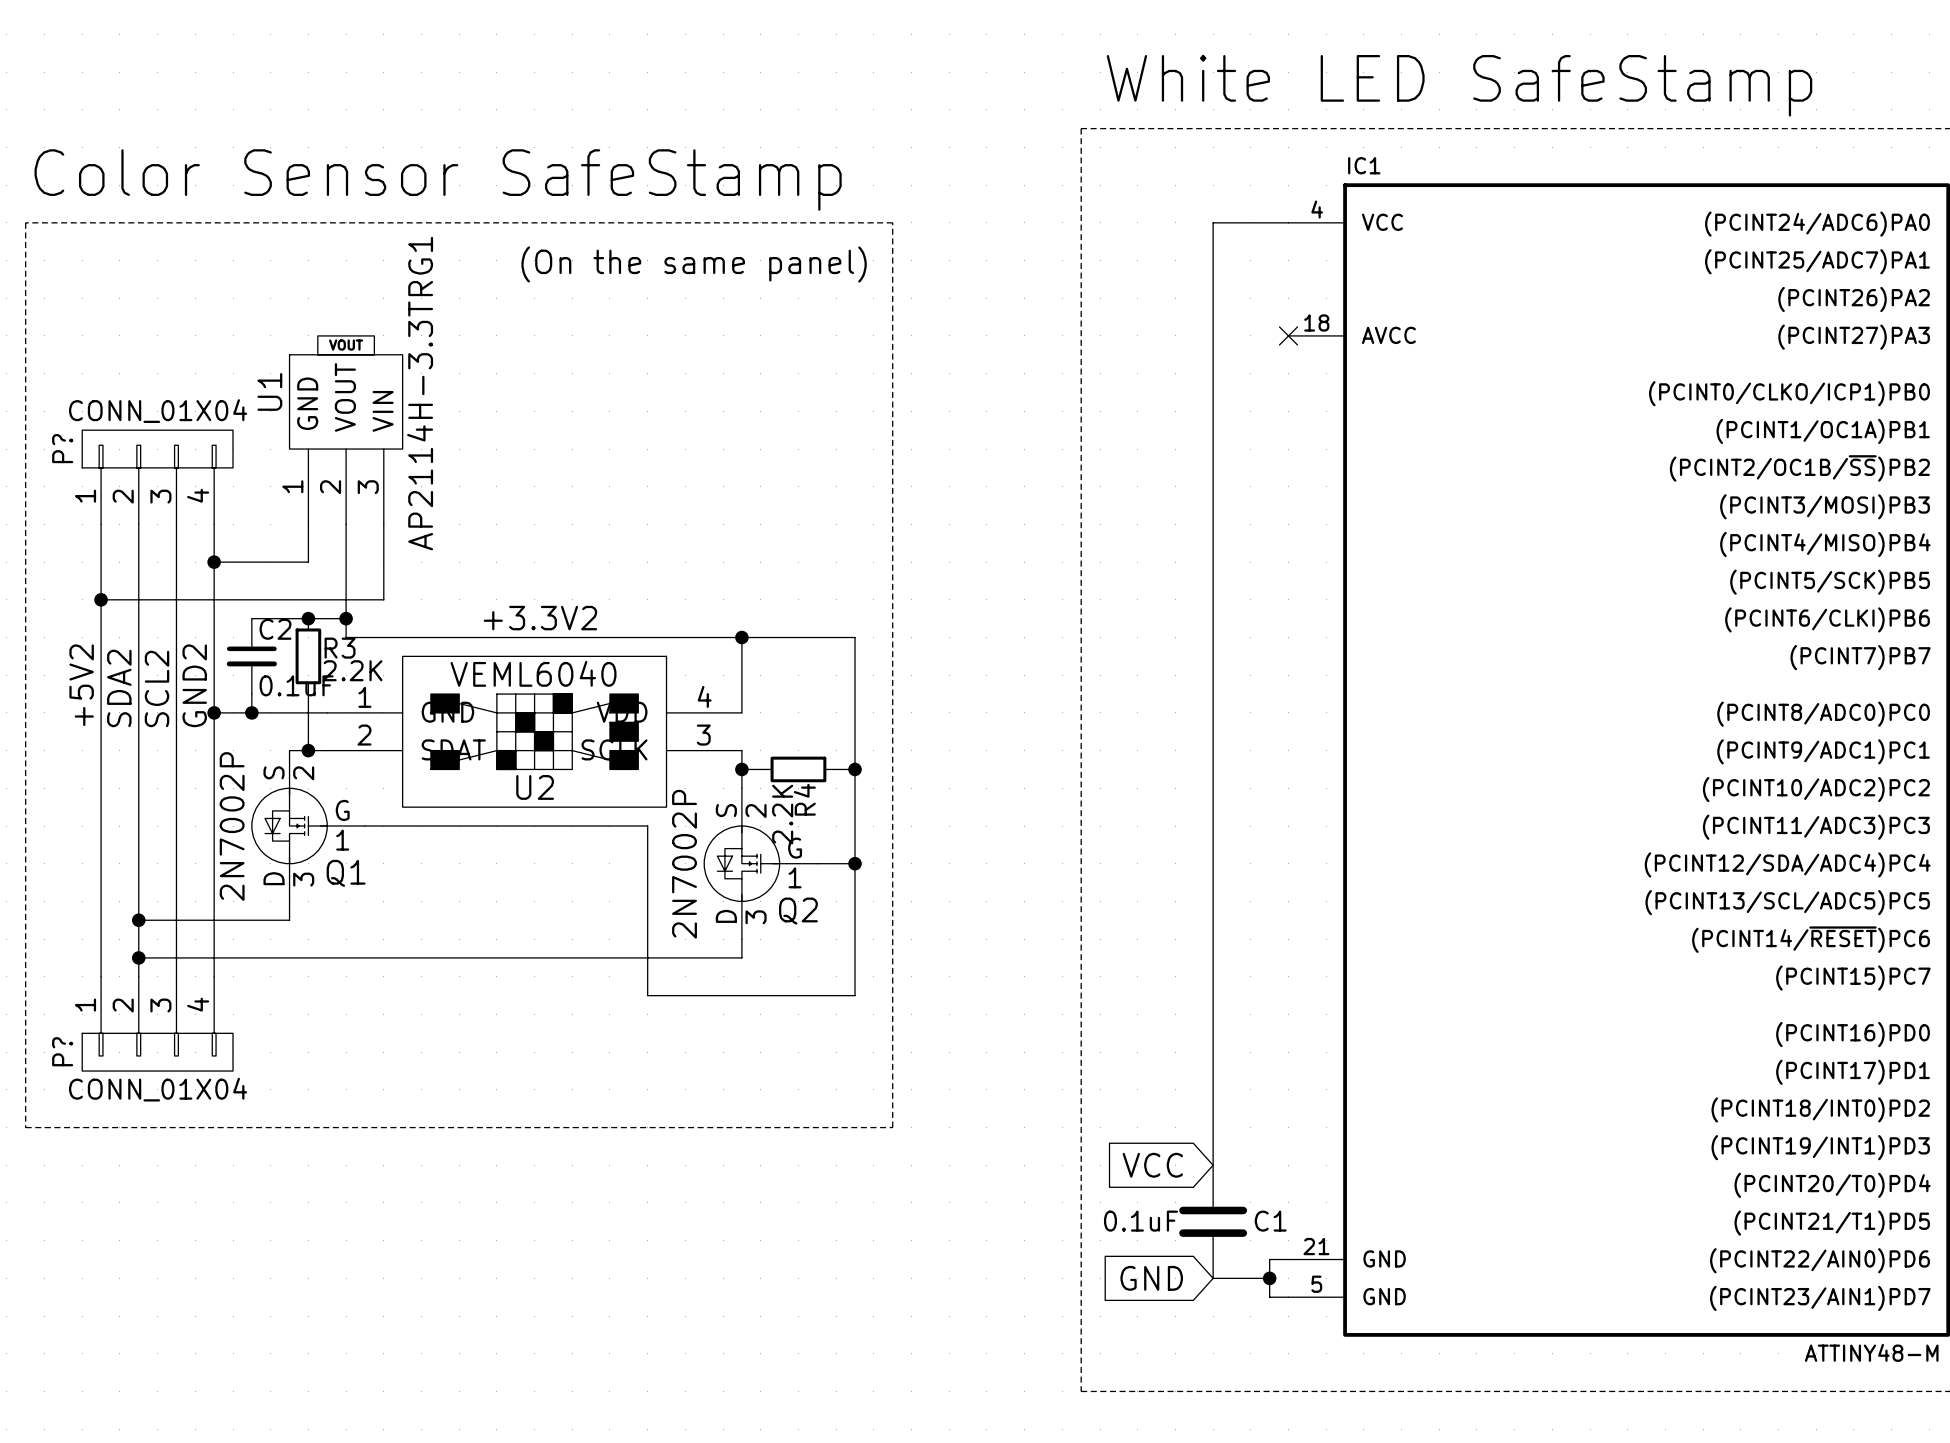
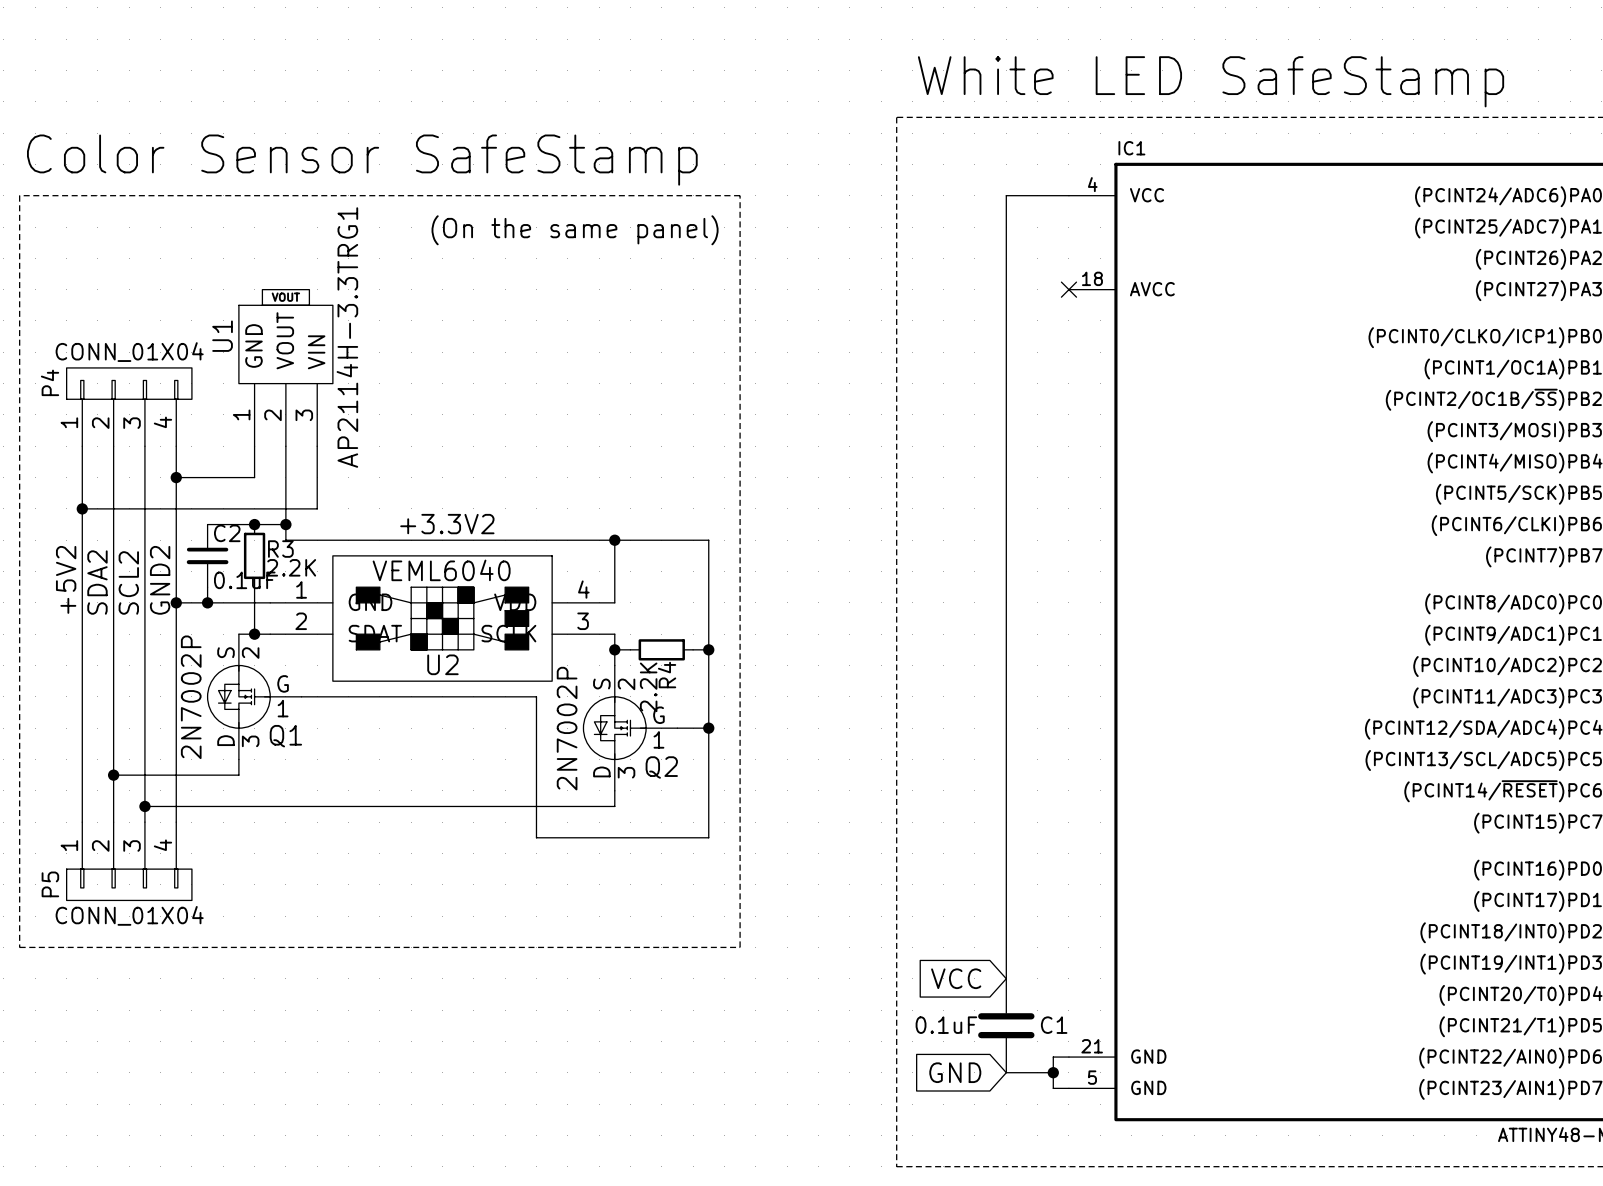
P? name: P? (62, 448) -> P4 (50, 382)
wire: (138, 957) (176, 957) -> none
junction position: (138, 957) -> (144, 806)
P? name: P? (62, 1051) -> P5 (50, 884)

